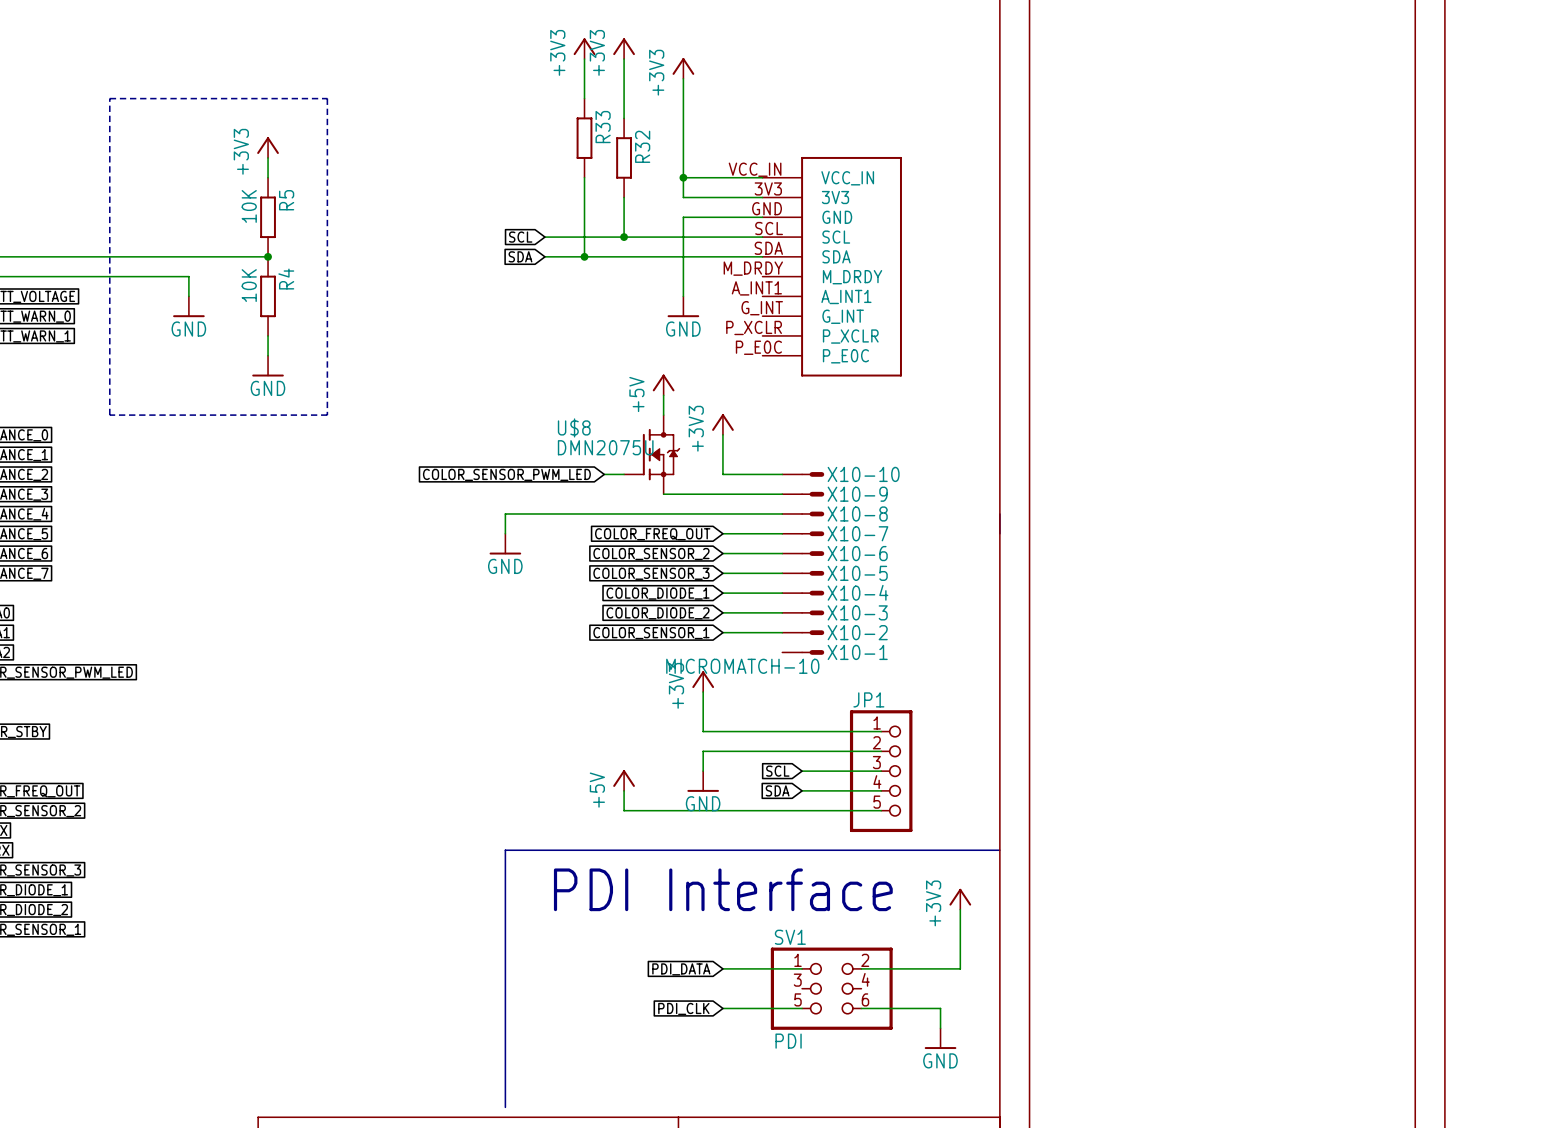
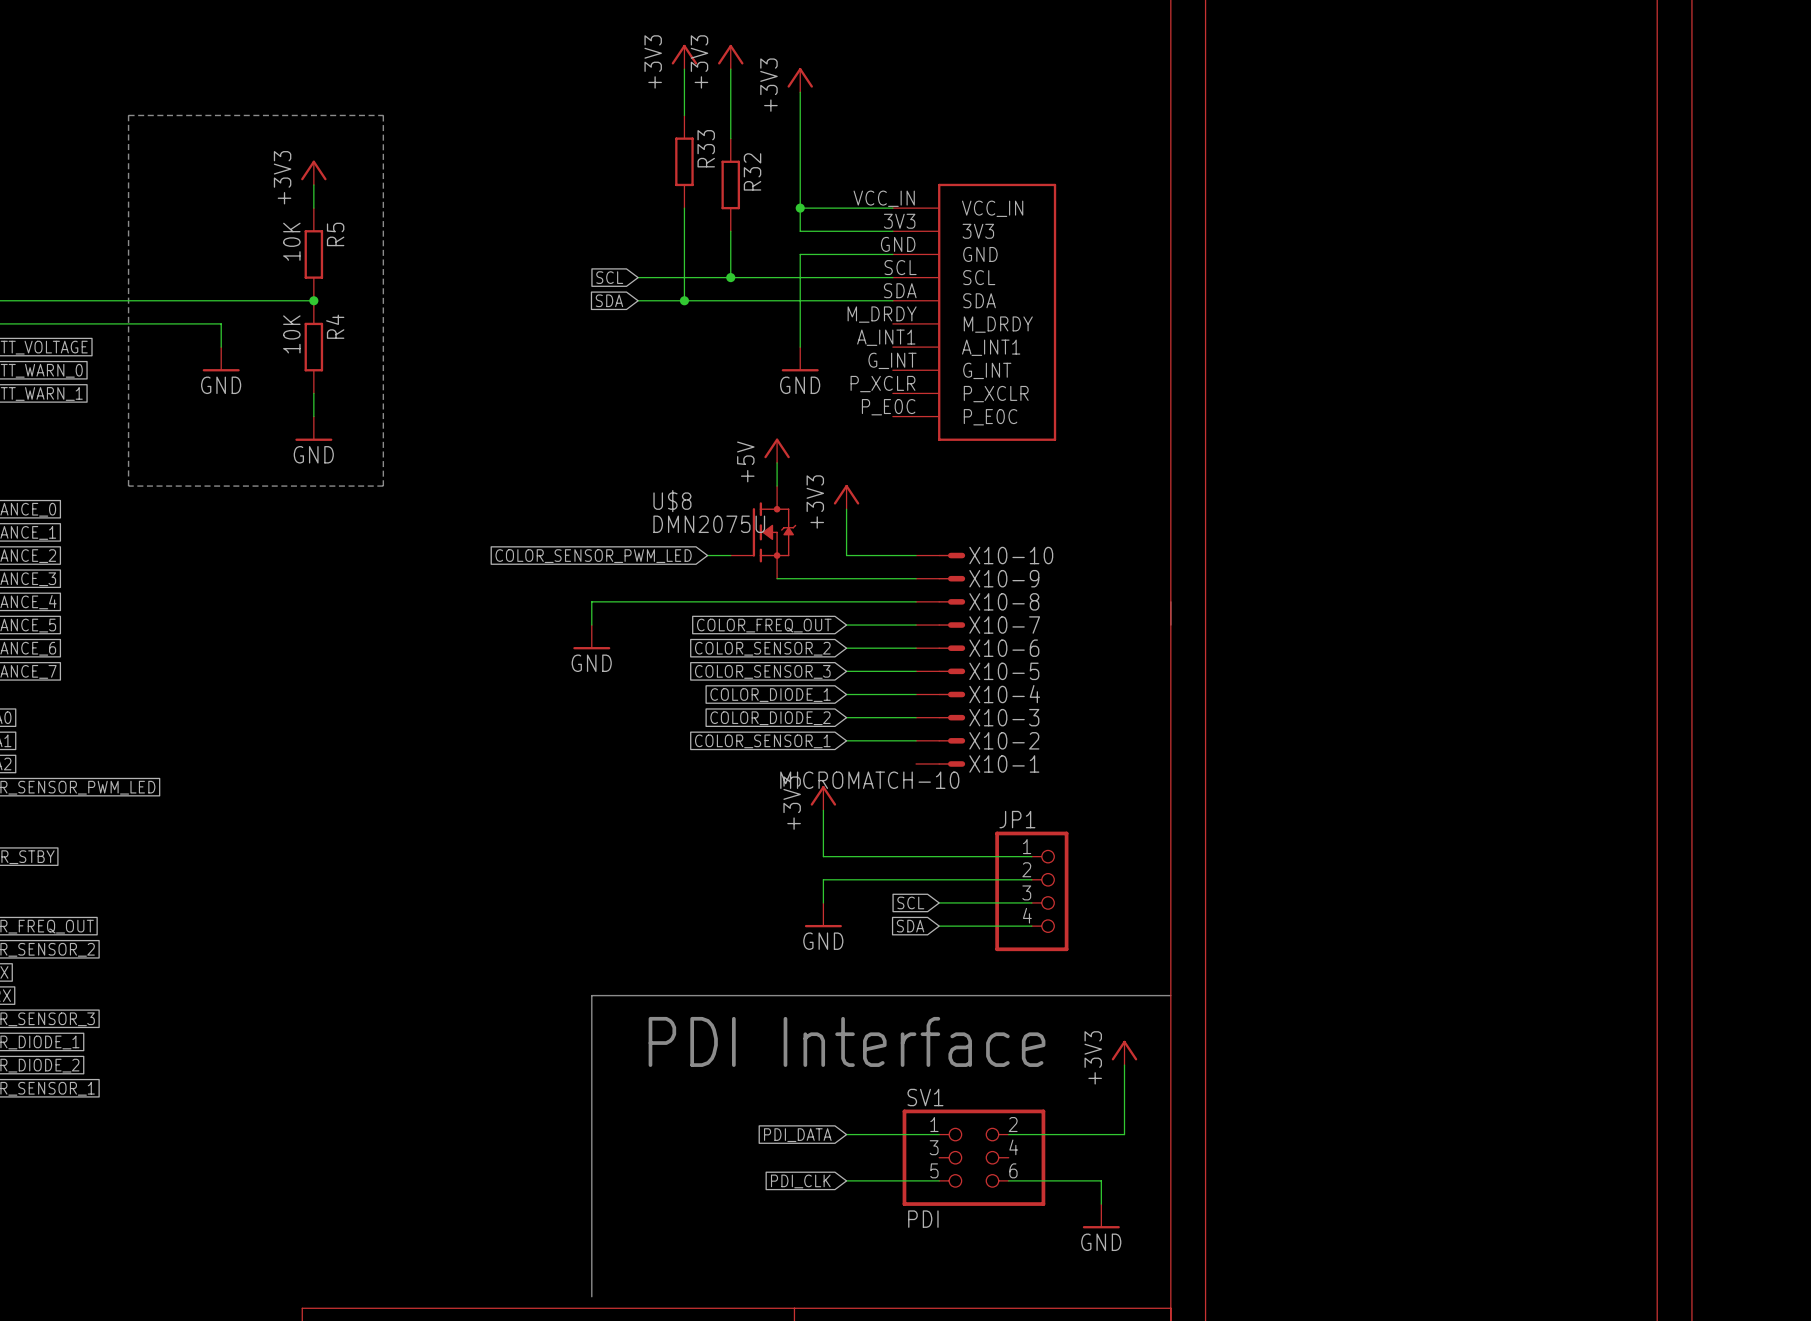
JP1 symbol: [849, 710, 913, 833] -> [995, 831, 1069, 952]
power symbol: +5V (624, 780) -> none
wire: (624, 790) (624, 810) (881, 810) -> none

